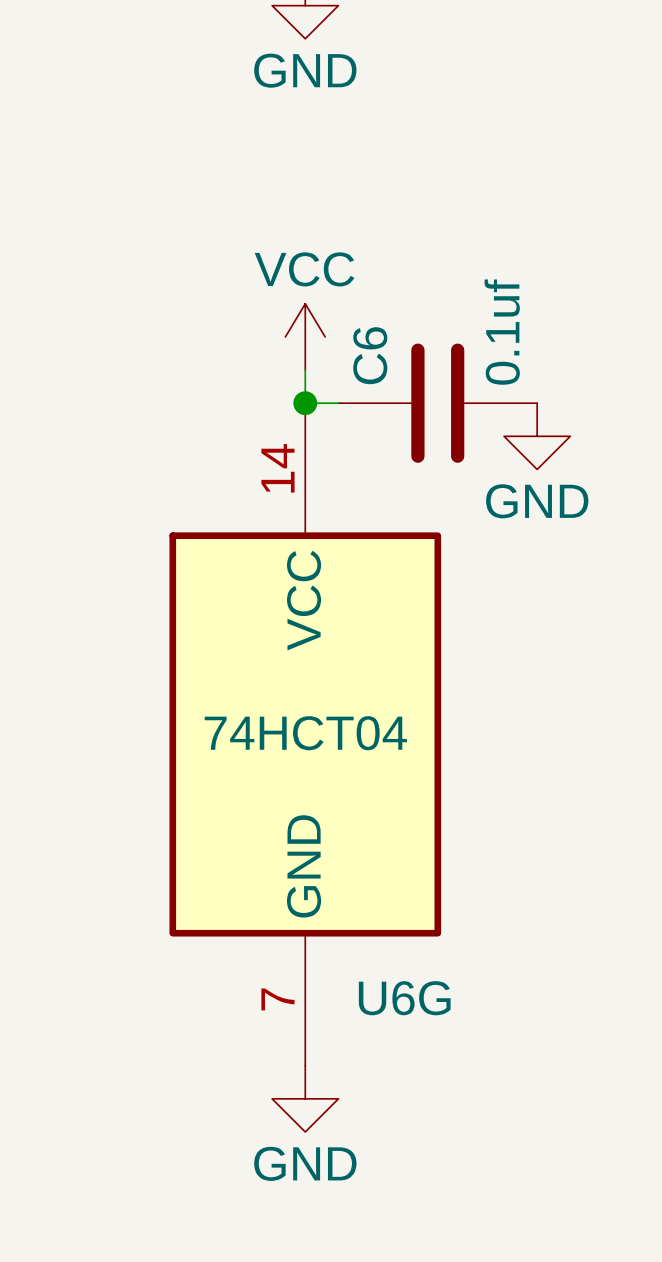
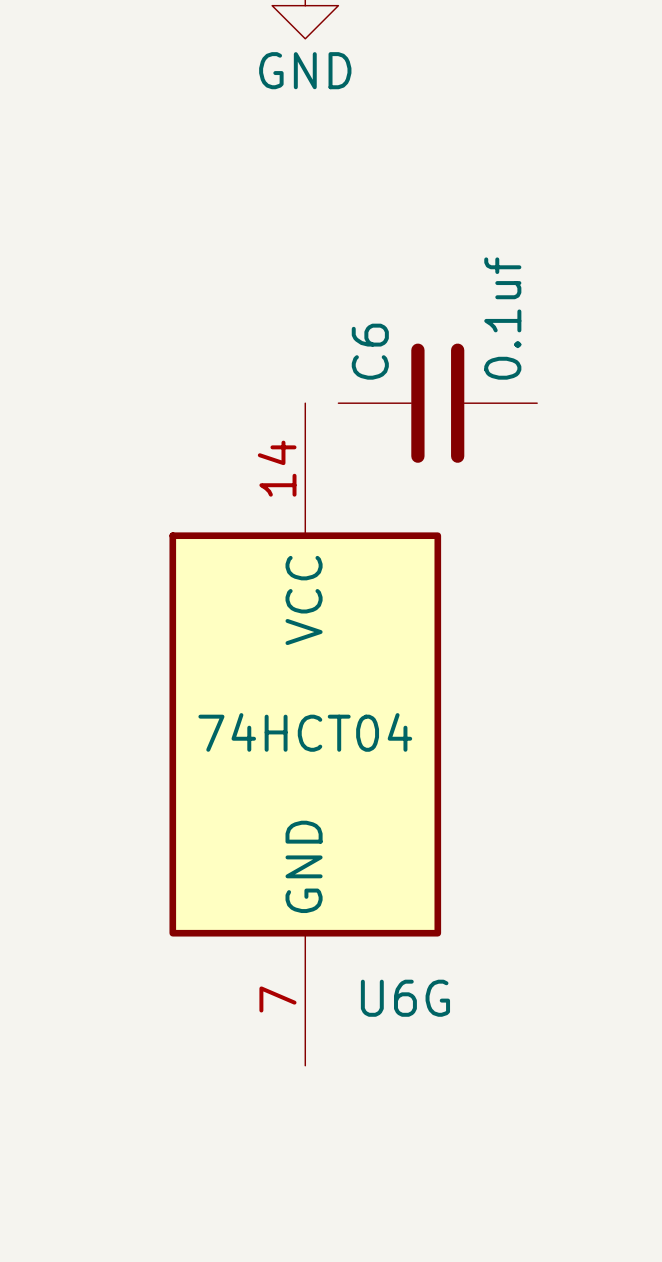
power symbol: VCC (305, 336) -> none
wire: (305, 370) (305, 403) (338, 403) -> none
junction: (305, 403) -> none
power symbol: GND (537, 436) -> none
power symbol: GND (305, 1098) -> none

